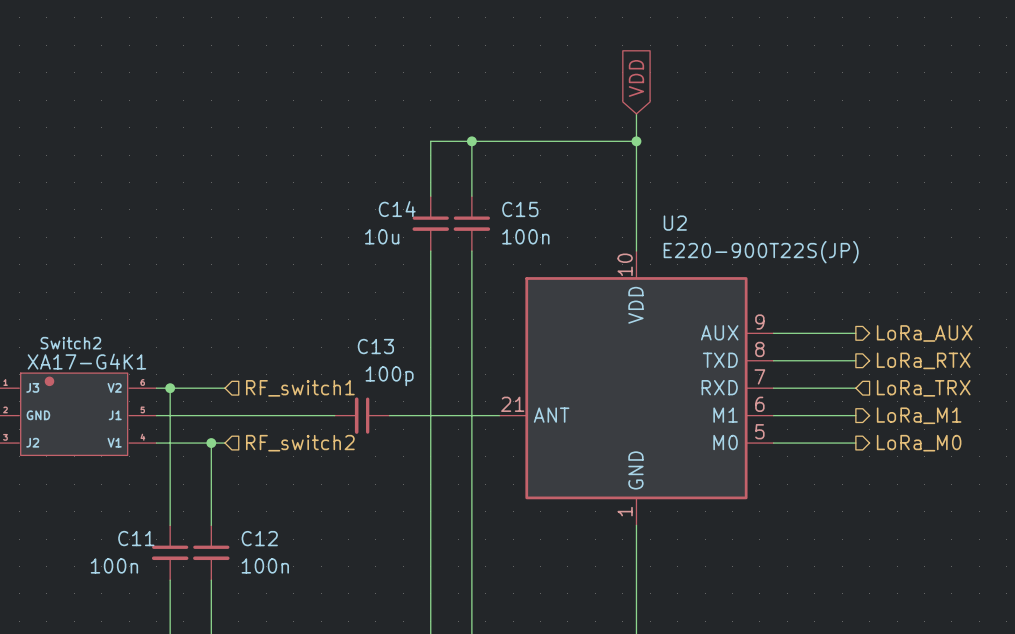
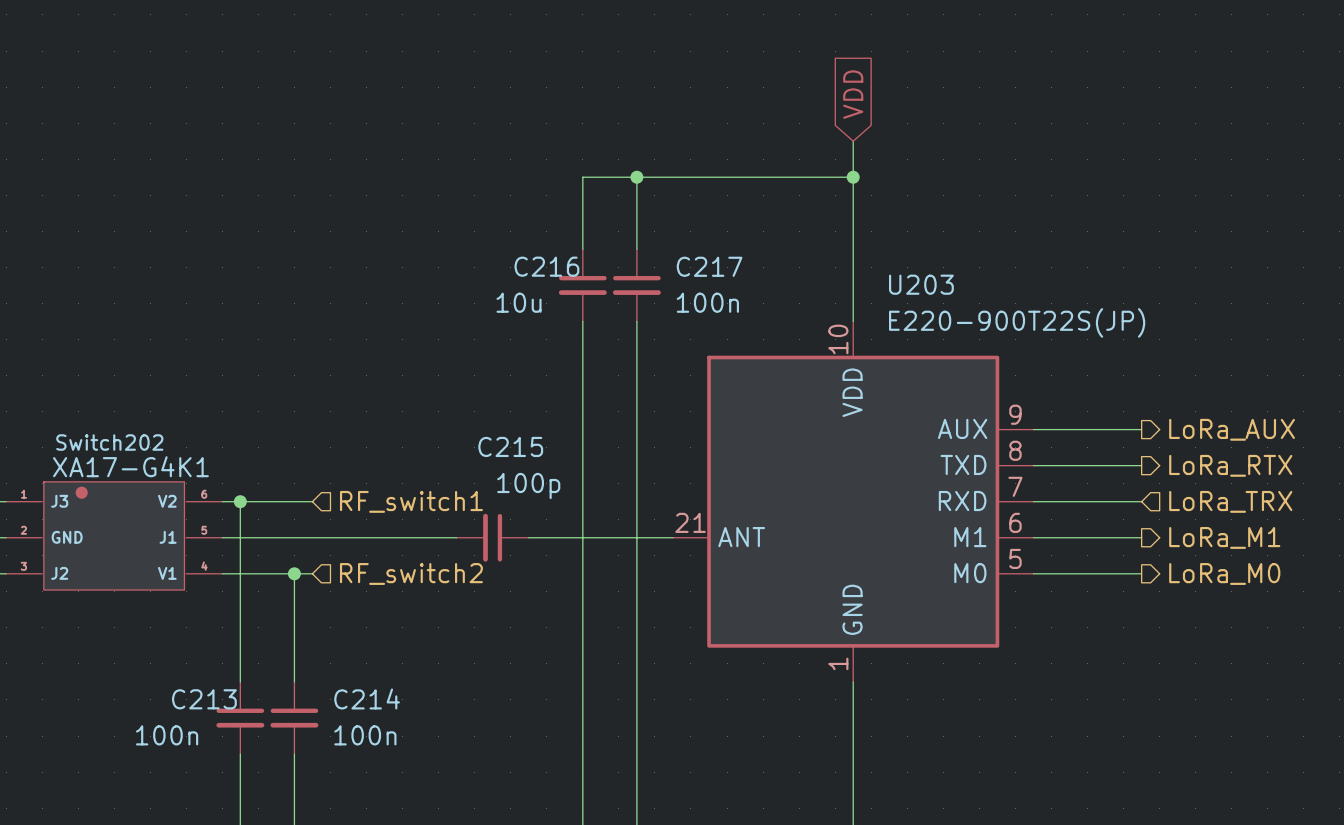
C14 name: C14 (397, 209) -> C216 (546, 266)
C15 name: C15 (520, 209) -> C217 (709, 266)
U2 name: U2 (675, 223) -> U203 (921, 284)
Switch2 name: Switch2 (70, 343) -> Switch202 (109, 442)
C13 name: C13 (375, 346) -> C215 (510, 446)
C11 name: C11 (136, 538) -> C213 (204, 699)
C12 name: C12 (259, 538) -> C214 (367, 698)

